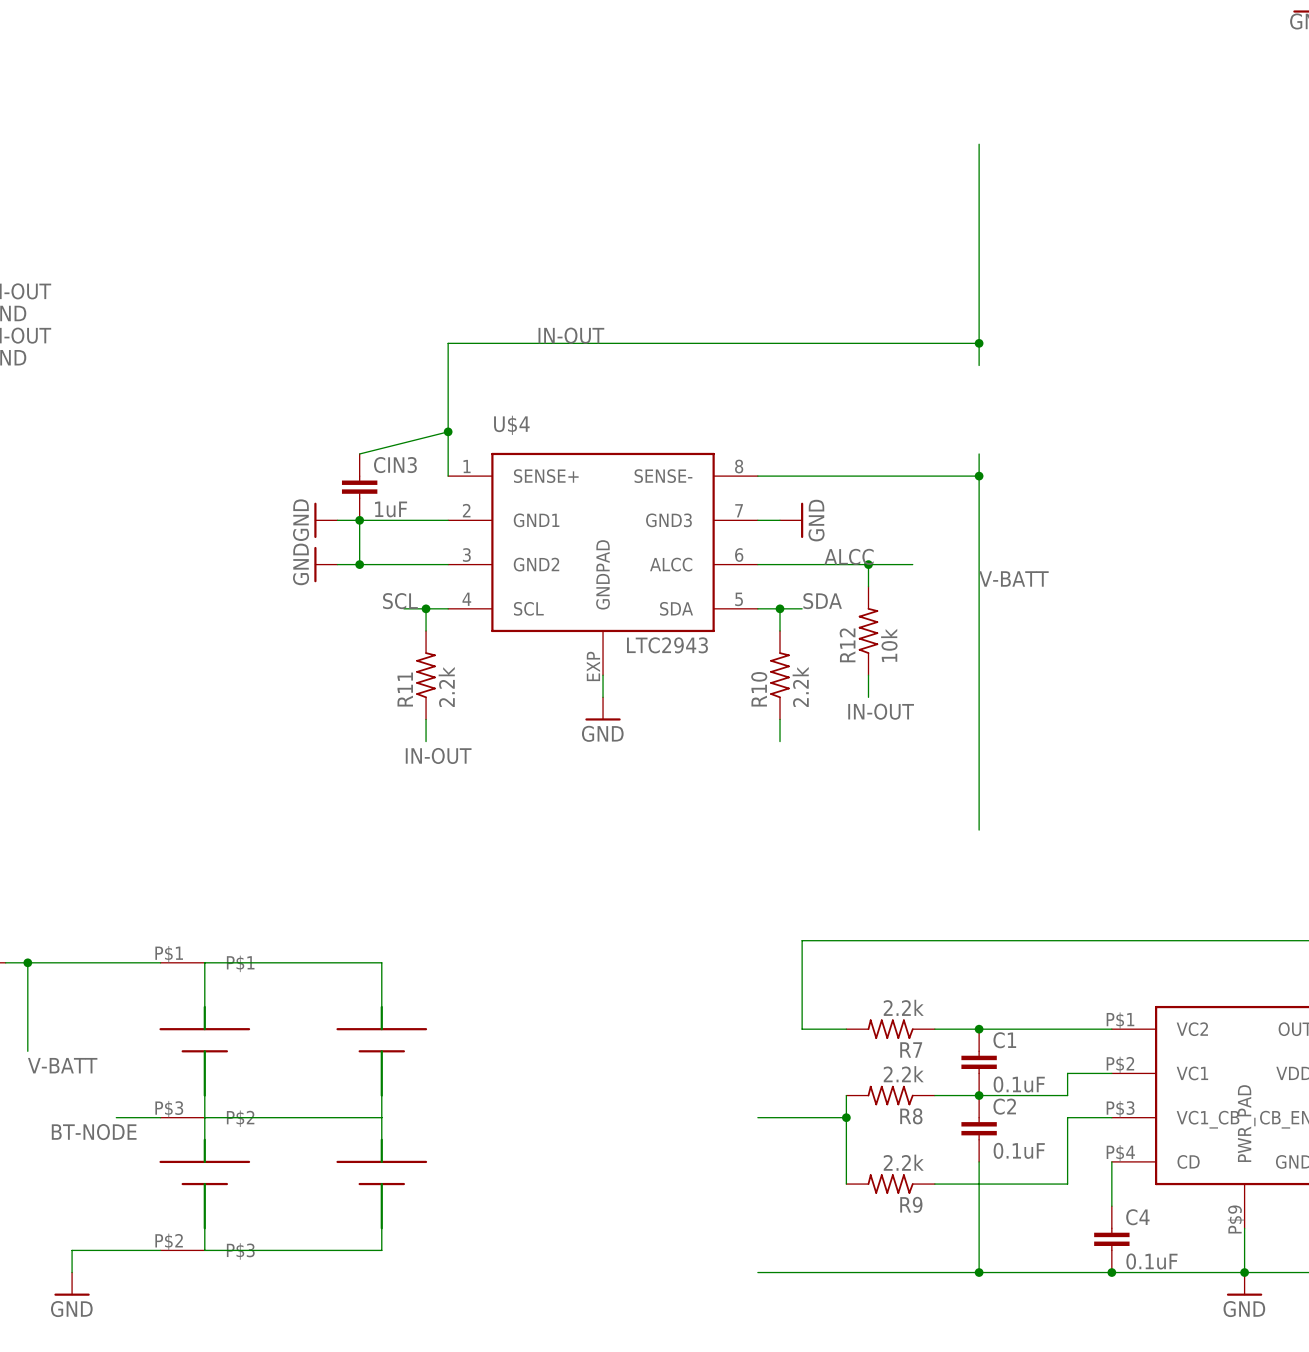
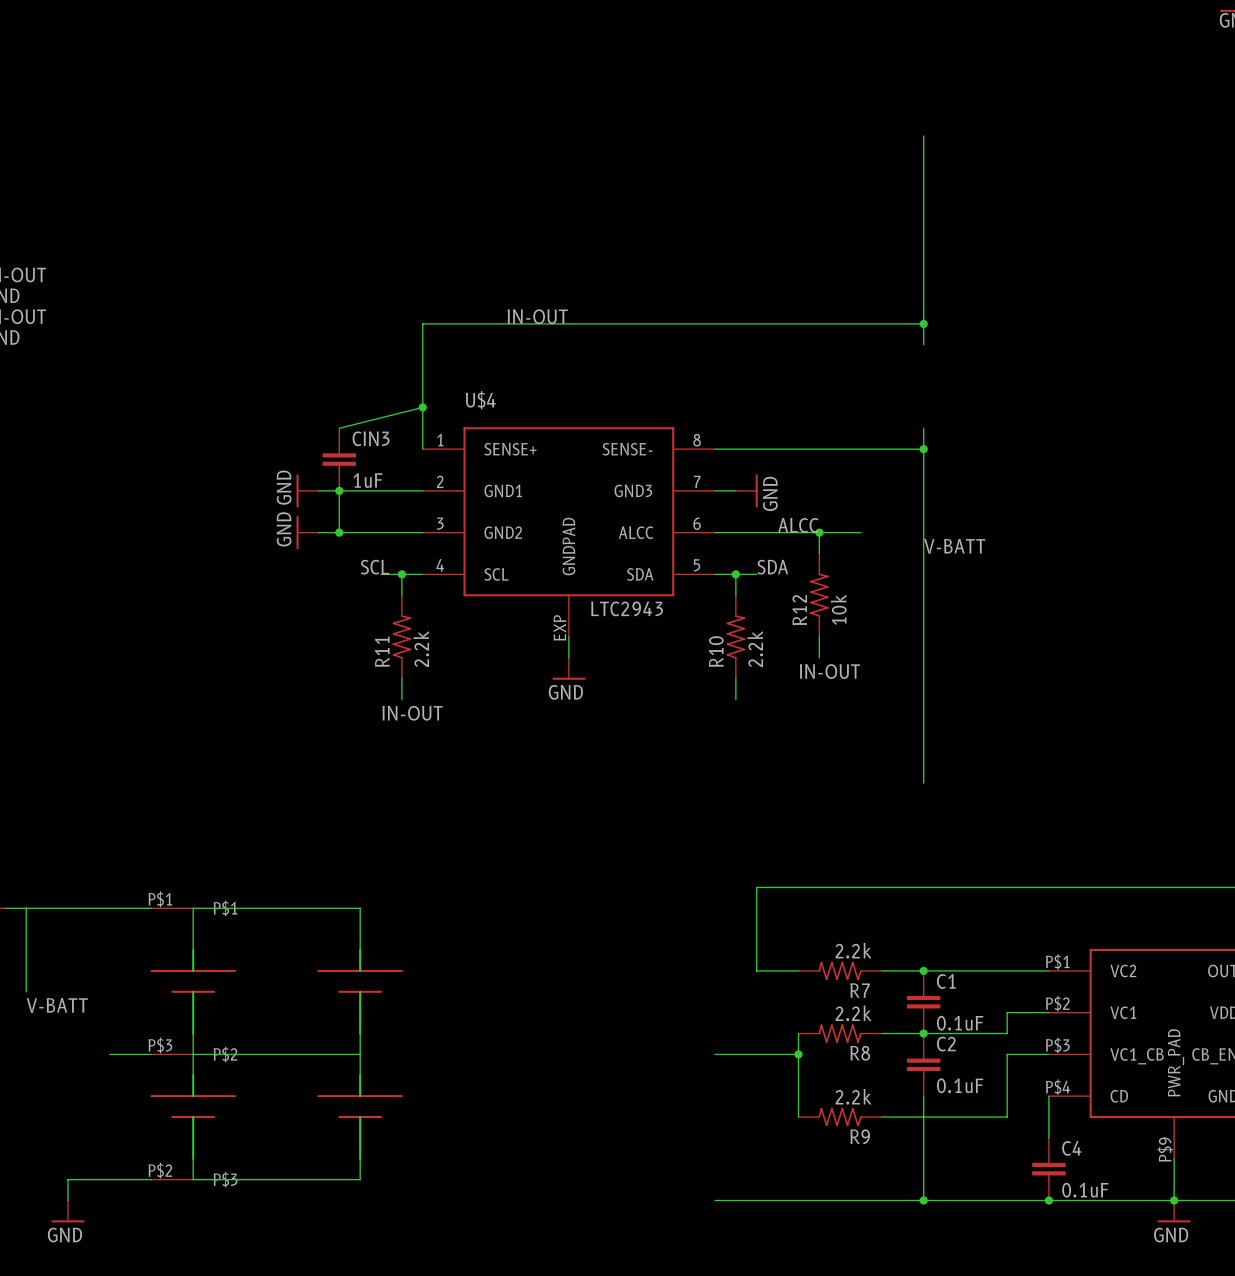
junction: (27, 962) -> none
label: BT-NODE (94, 1132) -> none

